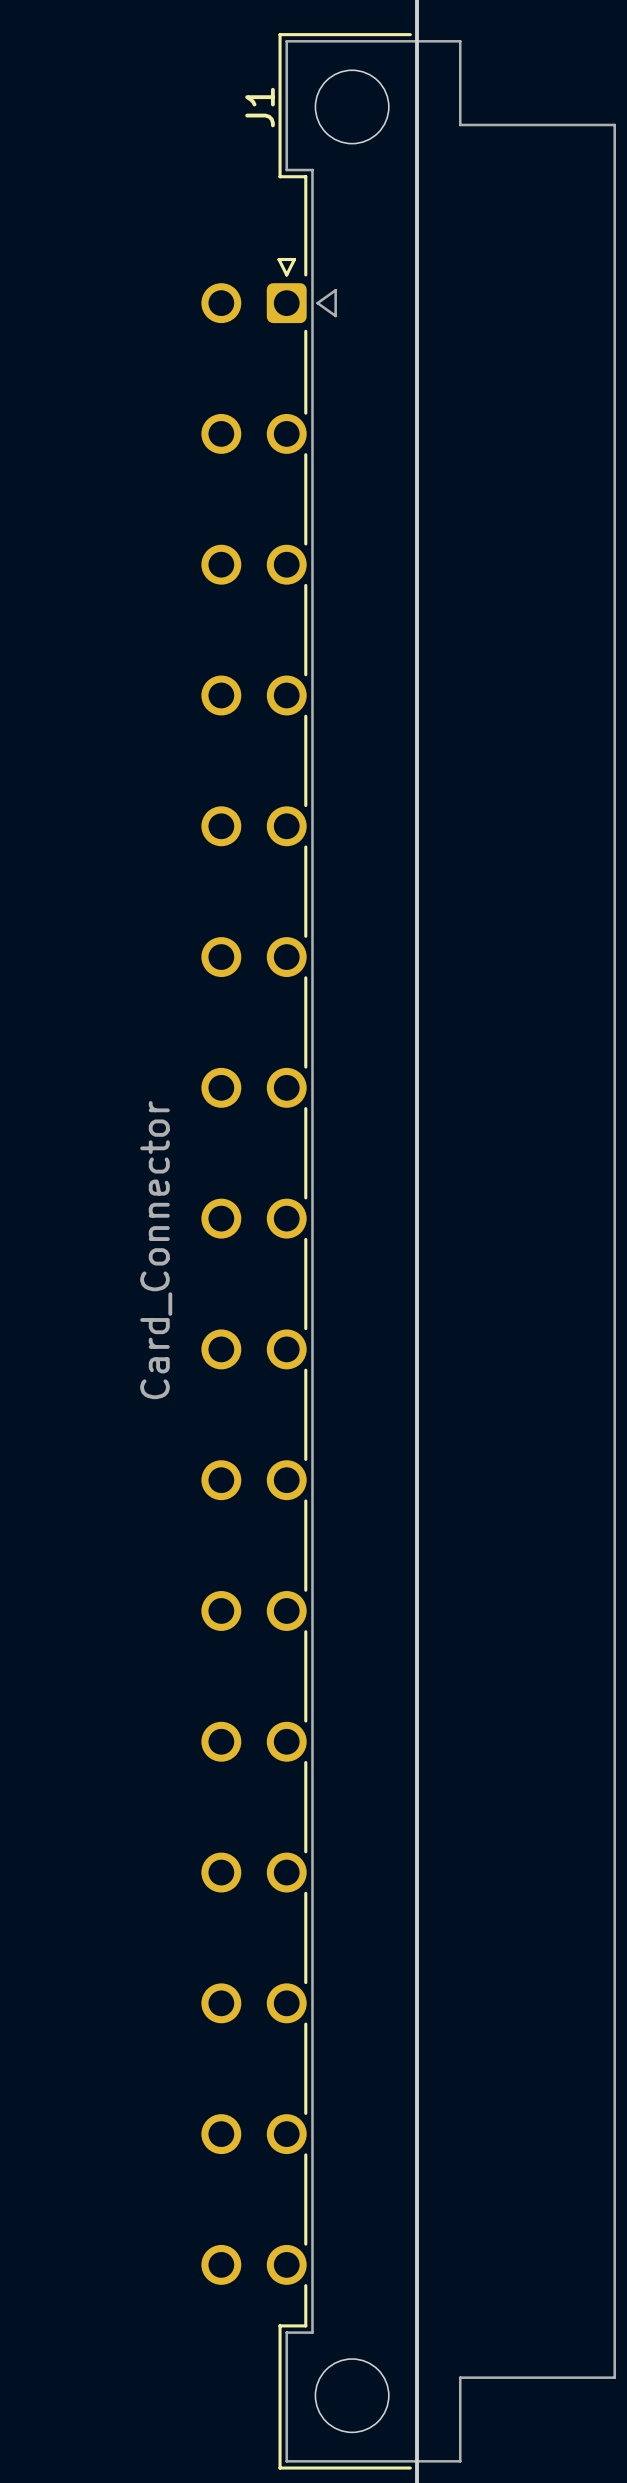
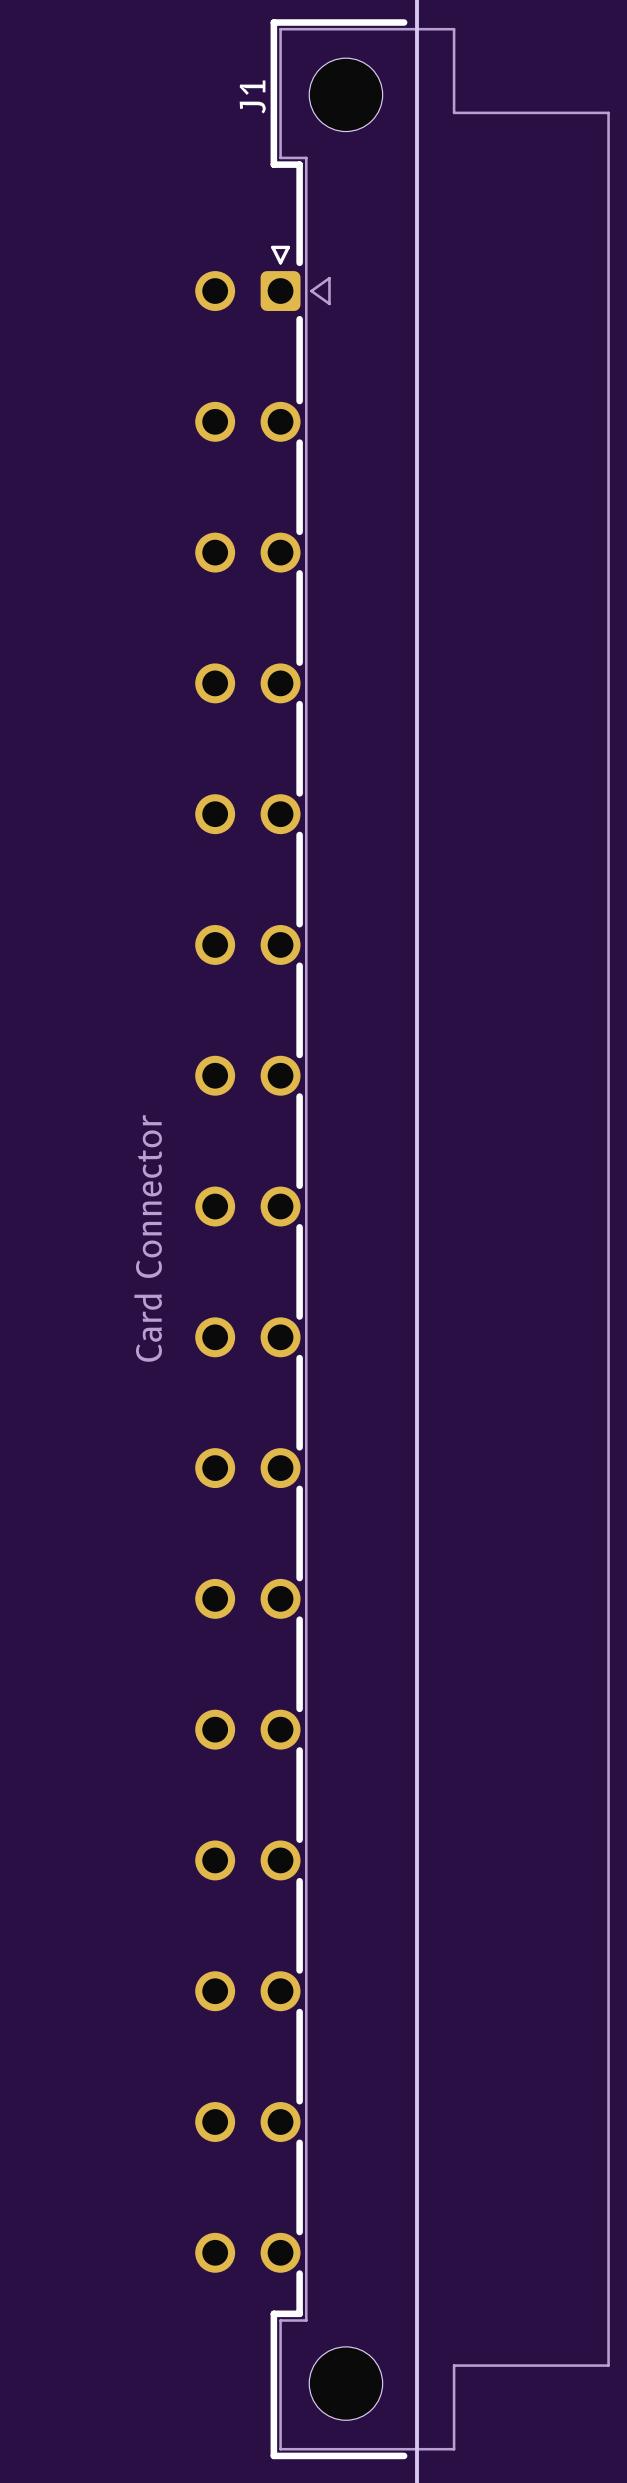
J1 footprint: [201, 33, 617, 2470] -> [195, 19, 610, 2460]
J1 value: Card_Connector (156, 1250) -> Card Connector (148, 1238)

